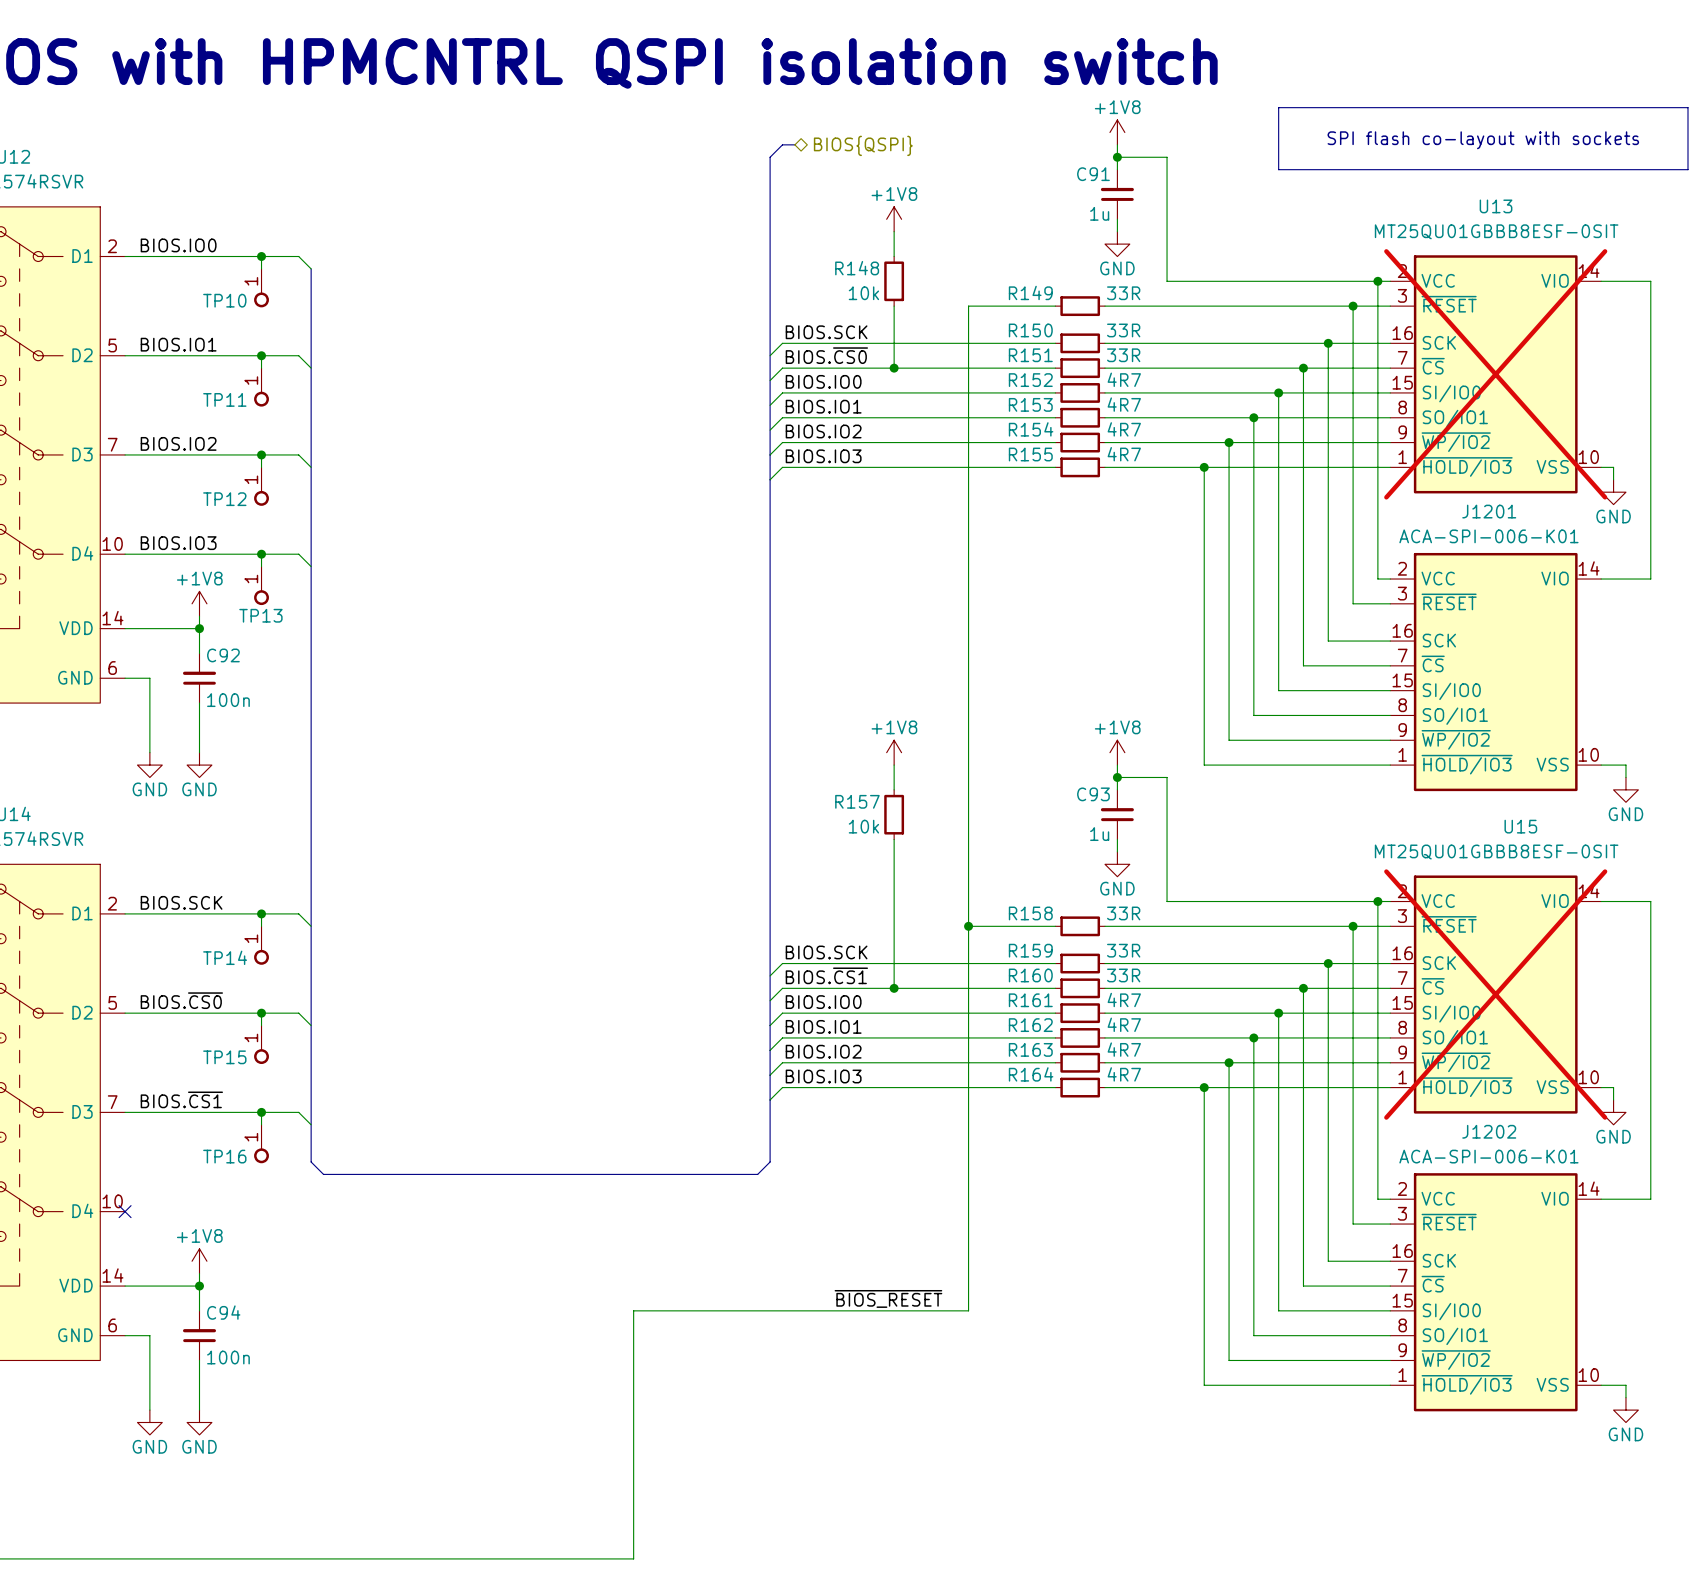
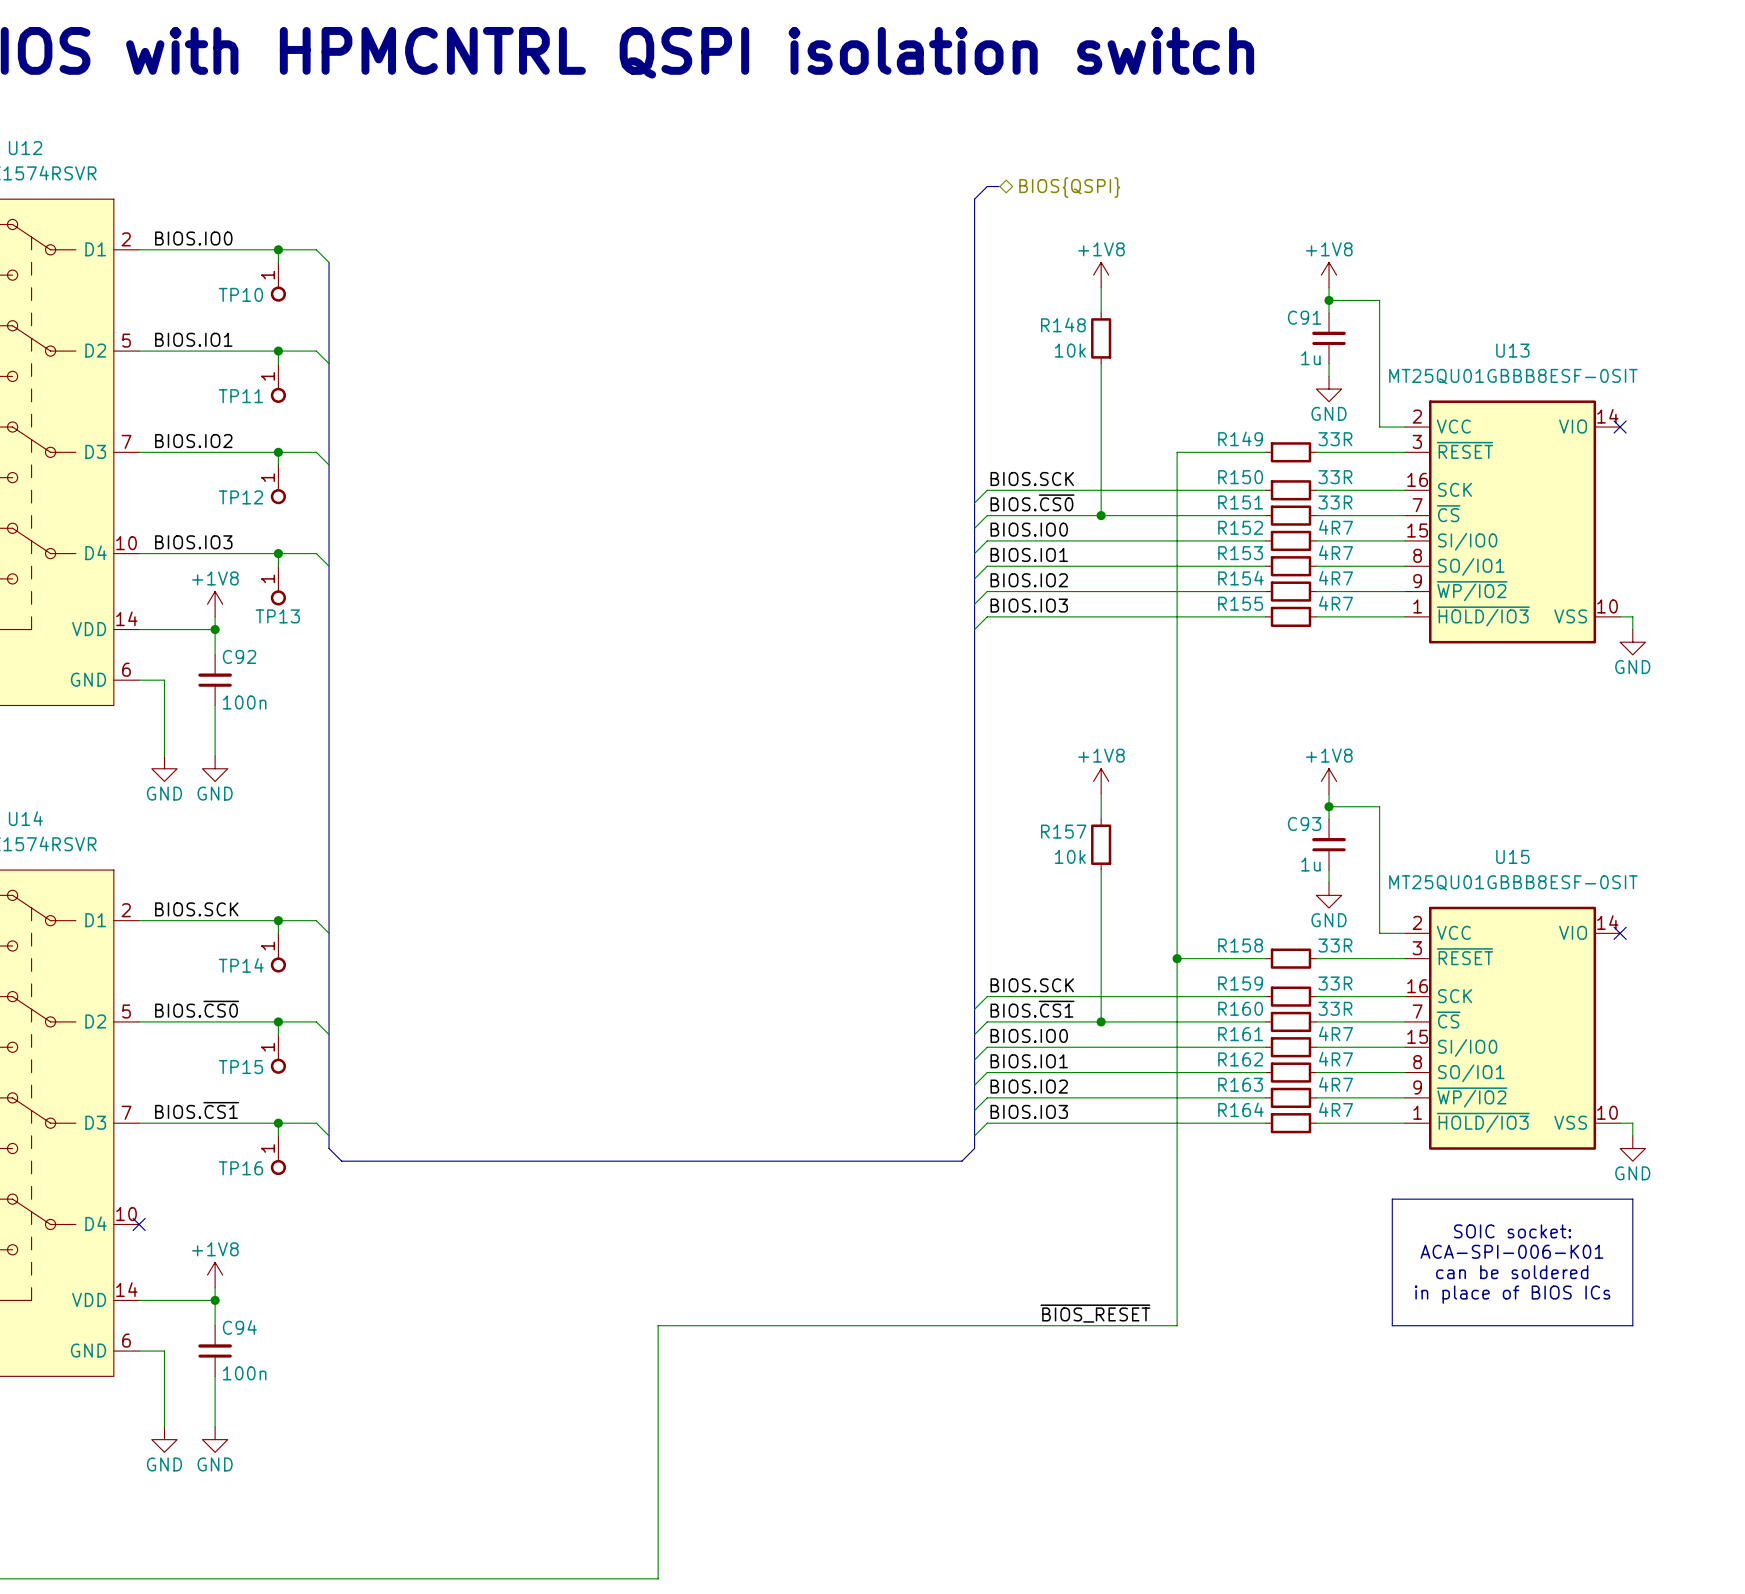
line: (1278, 107) (1687, 107) (1687, 169) (1278, 169) (1278, 107) -> none
power symbol: +1V8 (1117, 132) -> none
text: SPI flash co-layout with sockets (1483, 140) -> none
bus: (794, 144) (782, 144) (770, 157) (770, 1162) (757, 1174) (323, 1174) (311, 1162) (311, 1137) -> (999, 186) (987, 186) (974, 199) (974, 1148) (961, 1161) (341, 1161) (329, 1148)
wire: (1117, 144) (1117, 169) -> (1329, 287) (1329, 313)
hierarchical label position: BIOS{QSPI} (863, 145) -> BIOS{QSPI} (1069, 187)
wire: (1117, 157) (1167, 157) (1167, 281) (1390, 281) -> none
junction: (1117, 157) -> none
C91 position: (1117, 194) -> (1329, 338)
power symbol: +1V8 (894, 219) -> none
wire: (1117, 219) (1117, 231) -> (1329, 363) (1329, 376)
wire: (894, 231) (894, 256) -> (1101, 287) (1101, 313)
power symbol: GND (1117, 244) -> none
R148 position: (894, 281) -> (1101, 338)
power symbol: none -> +1V8 (1101, 275)
power symbol: none -> +1V8 (1329, 275)
wire: (1377, 281) (1377, 579) (1390, 579) -> none
junction: (1377, 281) -> none
wire: (1601, 281) (1650, 281) (1650, 579) (1601, 579) -> none
wire: (894, 306) (894, 368) -> none
wire: (1055, 306) (968, 306) (968, 1310) -> (1265, 452) (1177, 452) (1177, 1325) (999, 1325)
R149 position: (1080, 306) -> (1291, 452)
wire: (1105, 306) (1291, 306) -> none
junction: none -> (1329, 300)
wire: (1340, 306) (1390, 306) -> (1379, 300) (1379, 427) (1404, 427)
wire: (1353, 306) (1353, 603) (1390, 603) -> none
junction: (1353, 306) -> none
label position: BIOS.SCK (826, 332) -> BIOS.SCK (1032, 479)
wire: (1055, 343) (782, 343) (770, 355) -> (1265, 490) (987, 490) (974, 502)
R150 position: (1080, 343) -> (1291, 490)
wire: (1105, 343) (1390, 343) -> none
wire: (1328, 343) (1328, 641) (1390, 641) -> none
junction: (1328, 343) -> none
label position: BIOS.~{CS0} (826, 355) -> BIOS.~{CS0} (1032, 502)
junction: (894, 368) -> none
wire: (1055, 368) (782, 368) (770, 380) -> (1265, 515) (987, 515) (974, 528)
wire: none -> (1101, 363) (1101, 515)
R151 position: (1080, 368) -> (1291, 515)
wire: (1105, 368) (1390, 368) -> none
wire: (1303, 368) (1303, 665) (1390, 665) -> none
junction: (1303, 368) -> none
U13 position: (1495, 374) -> (1512, 521)
U13 do-not-place cross: (1495, 374) -> none
label position: BIOS.IO0 (823, 381) -> BIOS.IO0 (1029, 529)
wire: (1055, 392) (782, 392) (770, 405) -> (1265, 540) (987, 540) (974, 553)
R152 position: (1080, 392) -> (1291, 540)
wire: (1105, 392) (1390, 392) -> none
wire: (1278, 392) (1278, 690) (1390, 690) -> none
junction: (1278, 392) -> none
power symbol: none -> GND (1329, 389)
label position: BIOS.IO1 (823, 406) -> BIOS.IO1 (1029, 554)
wire: (1055, 417) (782, 417) (770, 430) -> (1265, 566) (987, 566) (974, 578)
R153 position: (1080, 417) -> (1291, 566)
wire: (1105, 417) (1390, 417) -> none
wire: (1253, 417) (1253, 715) (1390, 715) -> none
junction: (1253, 417) -> none
no-connect mark: none -> (1620, 427)
label position: BIOS.IO2 (823, 431) -> BIOS.IO2 (1029, 580)
wire: (1055, 442) (782, 442) (770, 454) -> (1265, 591) (987, 591) (974, 604)
R154 position: (1080, 442) -> (1291, 591)
wire: (1105, 442) (1390, 442) -> none
wire: (1229, 442) (1229, 740) (1390, 740) -> none
junction: (1229, 442) -> none
wire: none -> (1316, 452) (1404, 452)
label position: BIOS.IO3 (823, 456) -> BIOS.IO3 (1029, 605)
wire: (1055, 467) (782, 467) (770, 479) -> (1265, 616) (987, 616) (974, 629)
R155 position: (1080, 467) -> (1291, 616)
wire: (1105, 467) (1390, 467) -> none
wire: (1204, 467) (1204, 765) (1390, 765) -> none
junction: (1204, 467) -> none
wire: (1601, 467) (1613, 467) (1613, 479) -> (1620, 616) (1632, 616) (1632, 629)
wire: none -> (1316, 490) (1404, 490)
power symbol: GND (1613, 492) -> none
junction: none -> (1101, 515)
wire: none -> (1316, 515) (1404, 515)
wire: none -> (1316, 540) (1404, 540)
wire: none -> (1316, 566) (1404, 566)
wire: none -> (1316, 591) (1404, 591)
wire: none -> (1316, 616) (1404, 616)
power symbol: none -> GND (1632, 642)
J1201: (1495, 672) -> none
power symbol: +1V8 (894, 752) -> none
power symbol position: +1V8 (1117, 752) -> +1V8 (1101, 781)
wire: (894, 765) (894, 789) -> (1101, 794) (1101, 819)
wire: (1117, 765) (1117, 789) -> (1329, 794) (1329, 819)
wire: (1601, 765) (1625, 765) (1625, 777) -> none
wire: (1117, 777) (1167, 777) (1167, 901) (1390, 901) -> none
junction: (1117, 777) -> none
power symbol: none -> +1V8 (1329, 781)
power symbol: GND (1625, 789) -> none
junction: none -> (1329, 806)
R157 position: (894, 814) -> (1101, 844)
C93 position: (1117, 814) -> (1329, 844)
U15 name position: U15 (1520, 826) -> U15 (1512, 856)
wire: (894, 839) (894, 988) -> (1101, 870) (1101, 1021)
wire: (1117, 839) (1117, 851) -> (1329, 870) (1329, 882)
power symbol: GND (1117, 864) -> none
power symbol: none -> GND (1329, 895)
wire: (1377, 901) (1377, 1199) (1390, 1199) -> none
junction: (1377, 901) -> none
wire: (1601, 901) (1650, 901) (1650, 1199) (1601, 1199) -> none
wire: (968, 926) (1055, 926) -> (1177, 958) (1265, 958)
junction: (968, 926) -> none
R158 position: (1080, 926) -> (1291, 958)
wire: (1105, 926) (1340, 926) -> (1329, 806) (1379, 806) (1379, 933)
wire: (1353, 926) (1353, 1224) (1390, 1224) -> none
junction: (1353, 926) -> none
no-connect mark: none -> (1620, 933)
junction: none -> (1177, 958)
wire: none -> (1316, 958) (1404, 958)
label position: BIOS.SCK (826, 952) -> BIOS.SCK (1032, 985)
wire: (1055, 963) (782, 963) (770, 975) -> (1265, 1123) (987, 1123) (974, 1135)
R159 position: (1080, 963) -> (1291, 996)
wire: (1105, 963) (1390, 963) -> none
wire: (1328, 963) (1328, 1261) (1390, 1261) -> none
junction: (1328, 963) -> none
label position: BIOS.~{CS1} (826, 975) -> BIOS.~{CS1} (1032, 1009)
junction: (894, 988) -> none
wire: (956, 988) (782, 988) (770, 1000) -> (987, 996) (974, 1009)
R160 position: (1080, 988) -> (1291, 1021)
wire: (1229, 988) (1278, 988) -> (1088, 996) (1139, 996)
wire: (1303, 988) (1303, 1286) (1390, 1286) -> none
junction: (1303, 988) -> none
U15 position: (1495, 994) -> (1512, 1028)
U15 do-not-place cross: (1495, 994) -> none
label position: BIOS.IO0 (823, 1002) -> BIOS.IO0 (1029, 1035)
wire: (956, 1013) (782, 1013) (770, 1025) -> (987, 1021) (974, 1034)
wire: none -> (1088, 1021) (1139, 1021)
junction: none -> (1101, 1021)
R161 position: (1080, 1013) -> (1291, 1047)
wire: (1229, 1013) (1278, 1013) (1278, 1310) (1390, 1310) -> none
junction: (1278, 1013) -> none
label position: BIOS.IO1 (823, 1026) -> BIOS.IO1 (1029, 1061)
wire: (956, 1037) (782, 1037) (770, 1050) -> (987, 1047) (974, 1059)
R162 position: (1080, 1037) -> (1291, 1072)
wire: (1229, 1037) (1278, 1037) -> (1088, 1047) (1139, 1047)
wire: (1253, 1037) (1253, 1335) (1390, 1335) -> none
junction: (1253, 1037) -> none
label position: BIOS.IO2 (823, 1051) -> BIOS.IO2 (1029, 1086)
wire: (956, 1062) (782, 1062) (770, 1075) -> (987, 1072) (974, 1085)
wire: none -> (1088, 1072) (1139, 1072)
R163 position: (1080, 1062) -> (1291, 1097)
junction: (1229, 1062) -> none
wire: (1278, 1062) (1229, 1062) (1229, 1360) (1390, 1360) -> none
label position: BIOS.IO3 (823, 1076) -> BIOS.IO3 (1029, 1111)
wire: (956, 1087) (782, 1087) (770, 1099) -> (987, 1097) (974, 1110)
R164 position: (1080, 1087) -> (1291, 1123)
wire: (1204, 1087) (1204, 1385) (1390, 1385) -> none
junction: (1204, 1087) -> none
wire: (1229, 1087) (1278, 1087) -> (1088, 1097) (1139, 1097)
wire: (1601, 1087) (1613, 1087) (1613, 1099) -> (1620, 1123) (1632, 1123) (1632, 1135)
wire: none -> (1316, 1123) (1404, 1123)
power symbol position: GND (1613, 1112) -> GND (1632, 1148)
line: none -> (1392, 1199) (1632, 1199) (1632, 1325) (1392, 1325) (1392, 1199)
text: none -> SOIC socket: (1512, 1231)
text: none -> ACA-SPI-006-K01 (1511, 1251)
text: none -> can be soldered (1512, 1272)
text: none -> in place of BIOS ICs (1512, 1294)
J1202: (1495, 1292) -> none
label position: ~{BIOS_RESET} (888, 1298) -> ~{BIOS_RESET} (1095, 1313)
wire: (1601, 1385) (1625, 1385) (1625, 1397) -> none
power symbol: GND (1625, 1410) -> none

